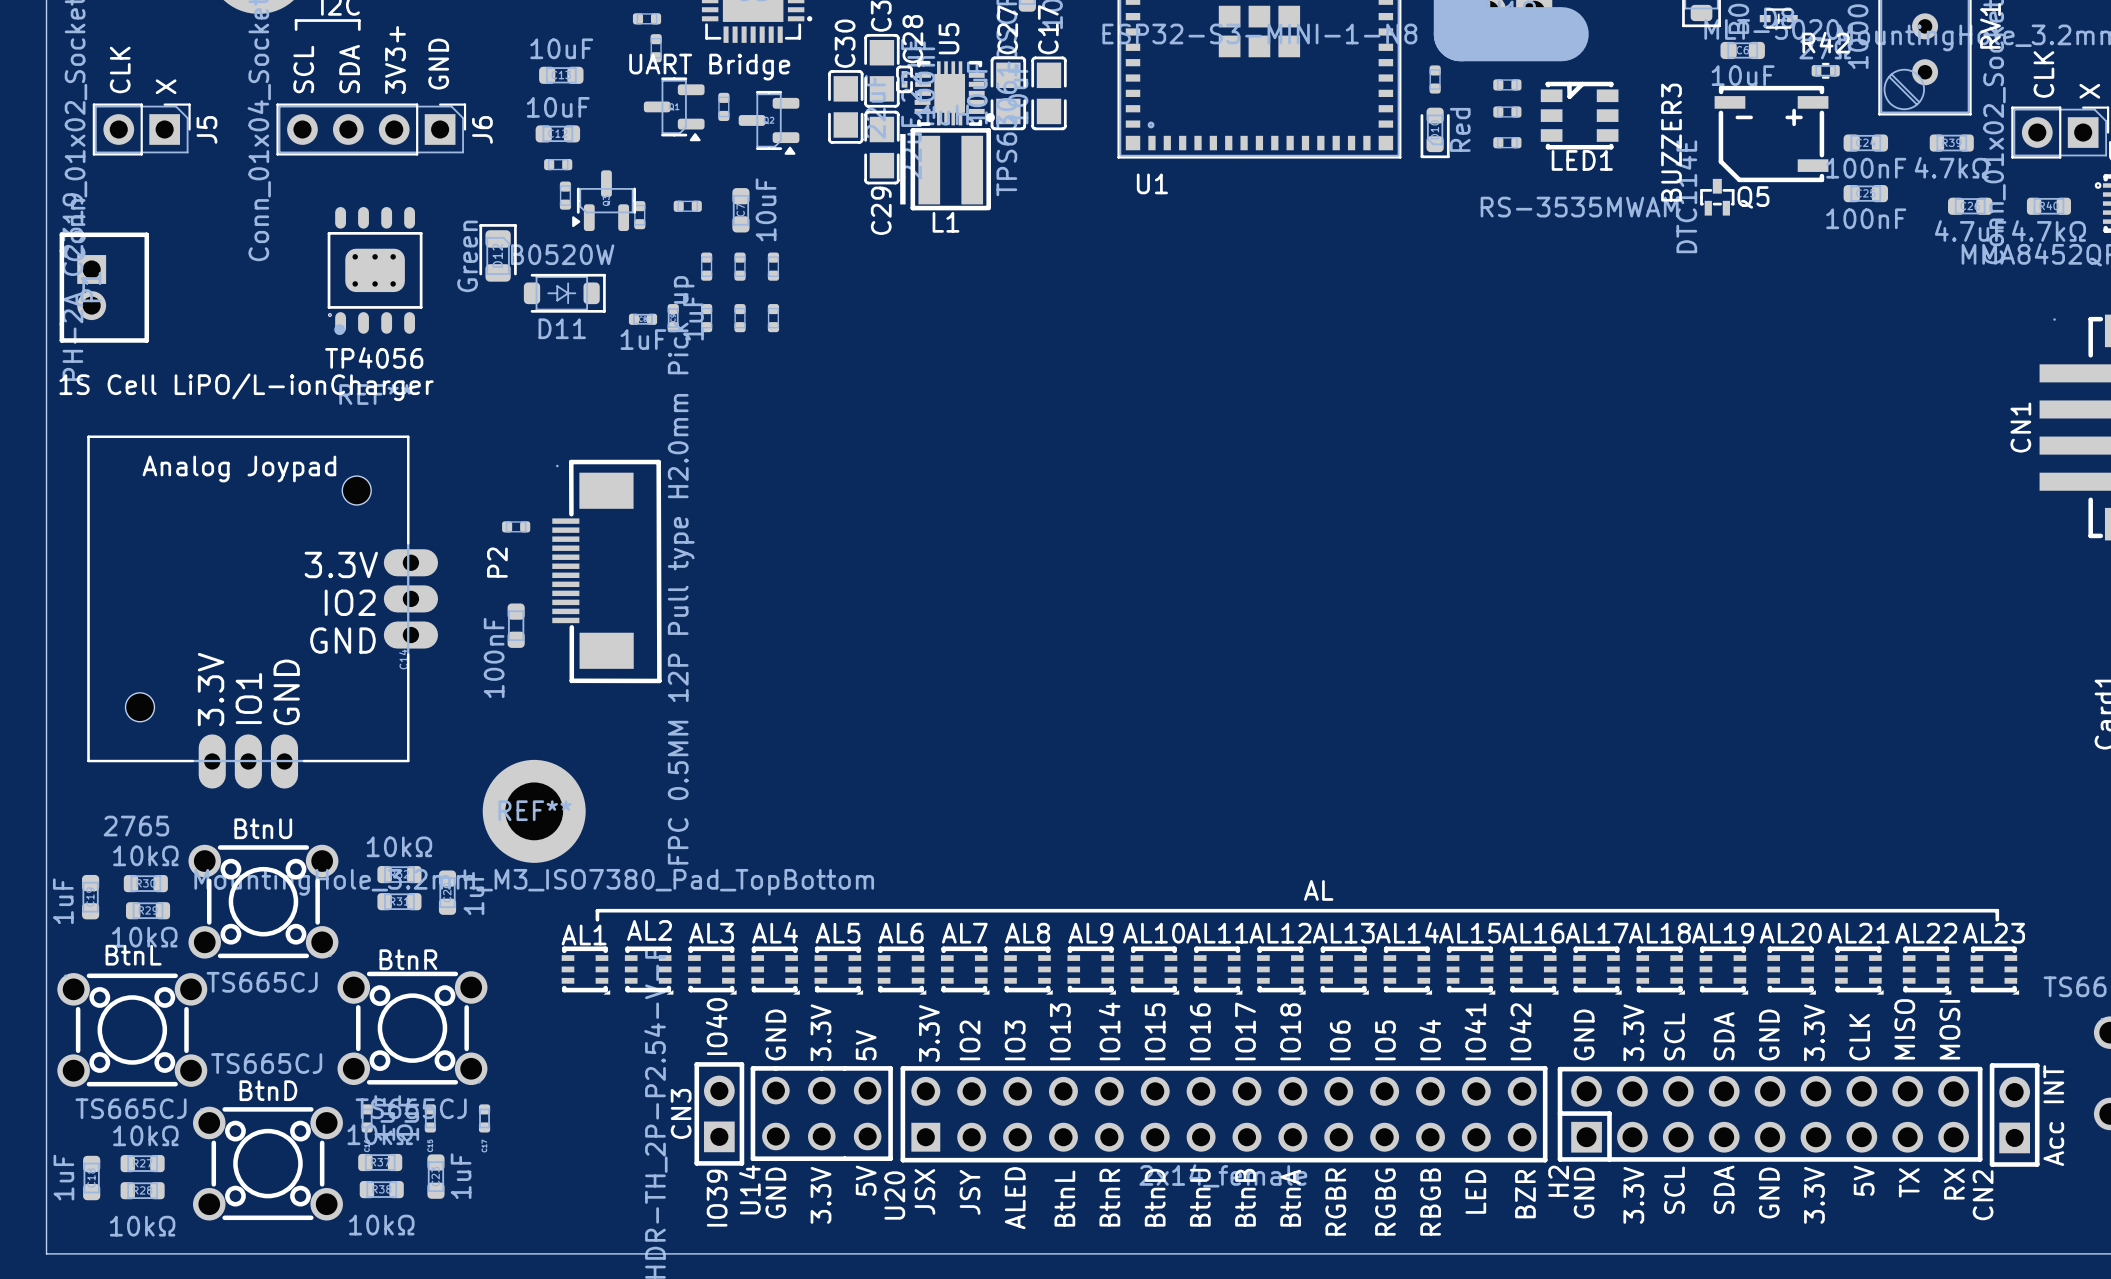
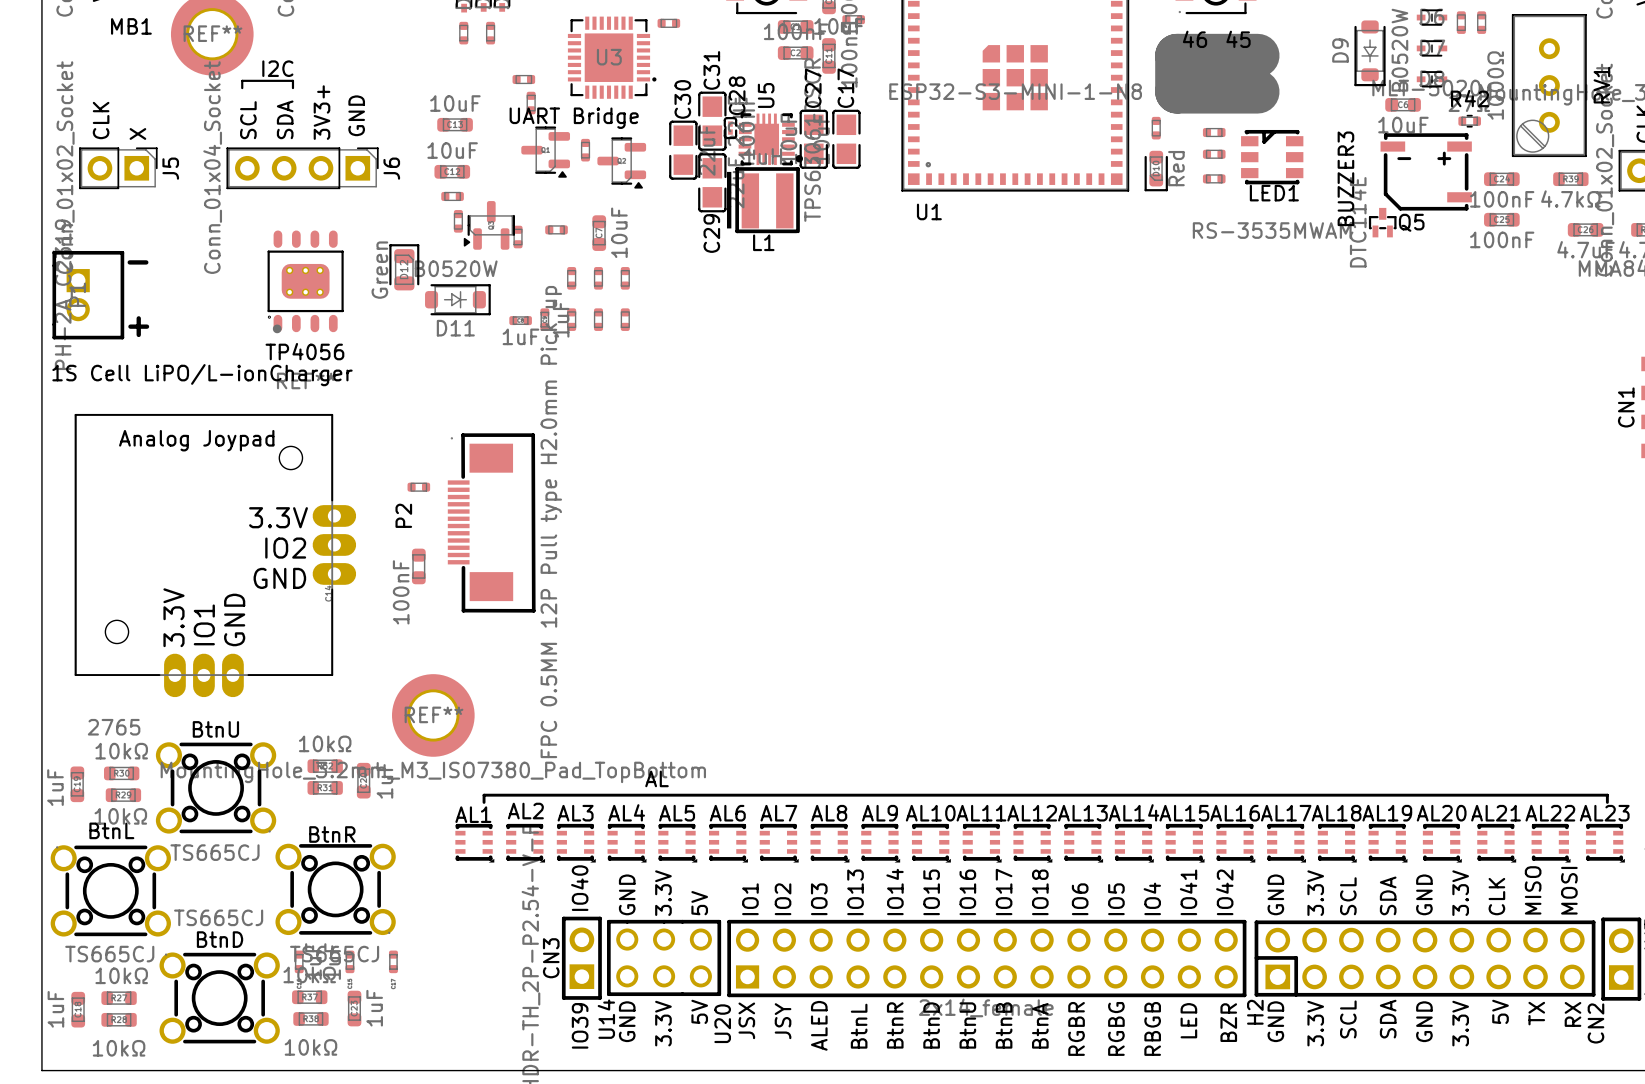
text: none -> - (138, 262)
text: none -> + (138, 326)
text: none -> AL (657, 778)
text: AL (1318, 890) -> none
text: 3.3V (929, 1033) -> IO1 (750, 899)

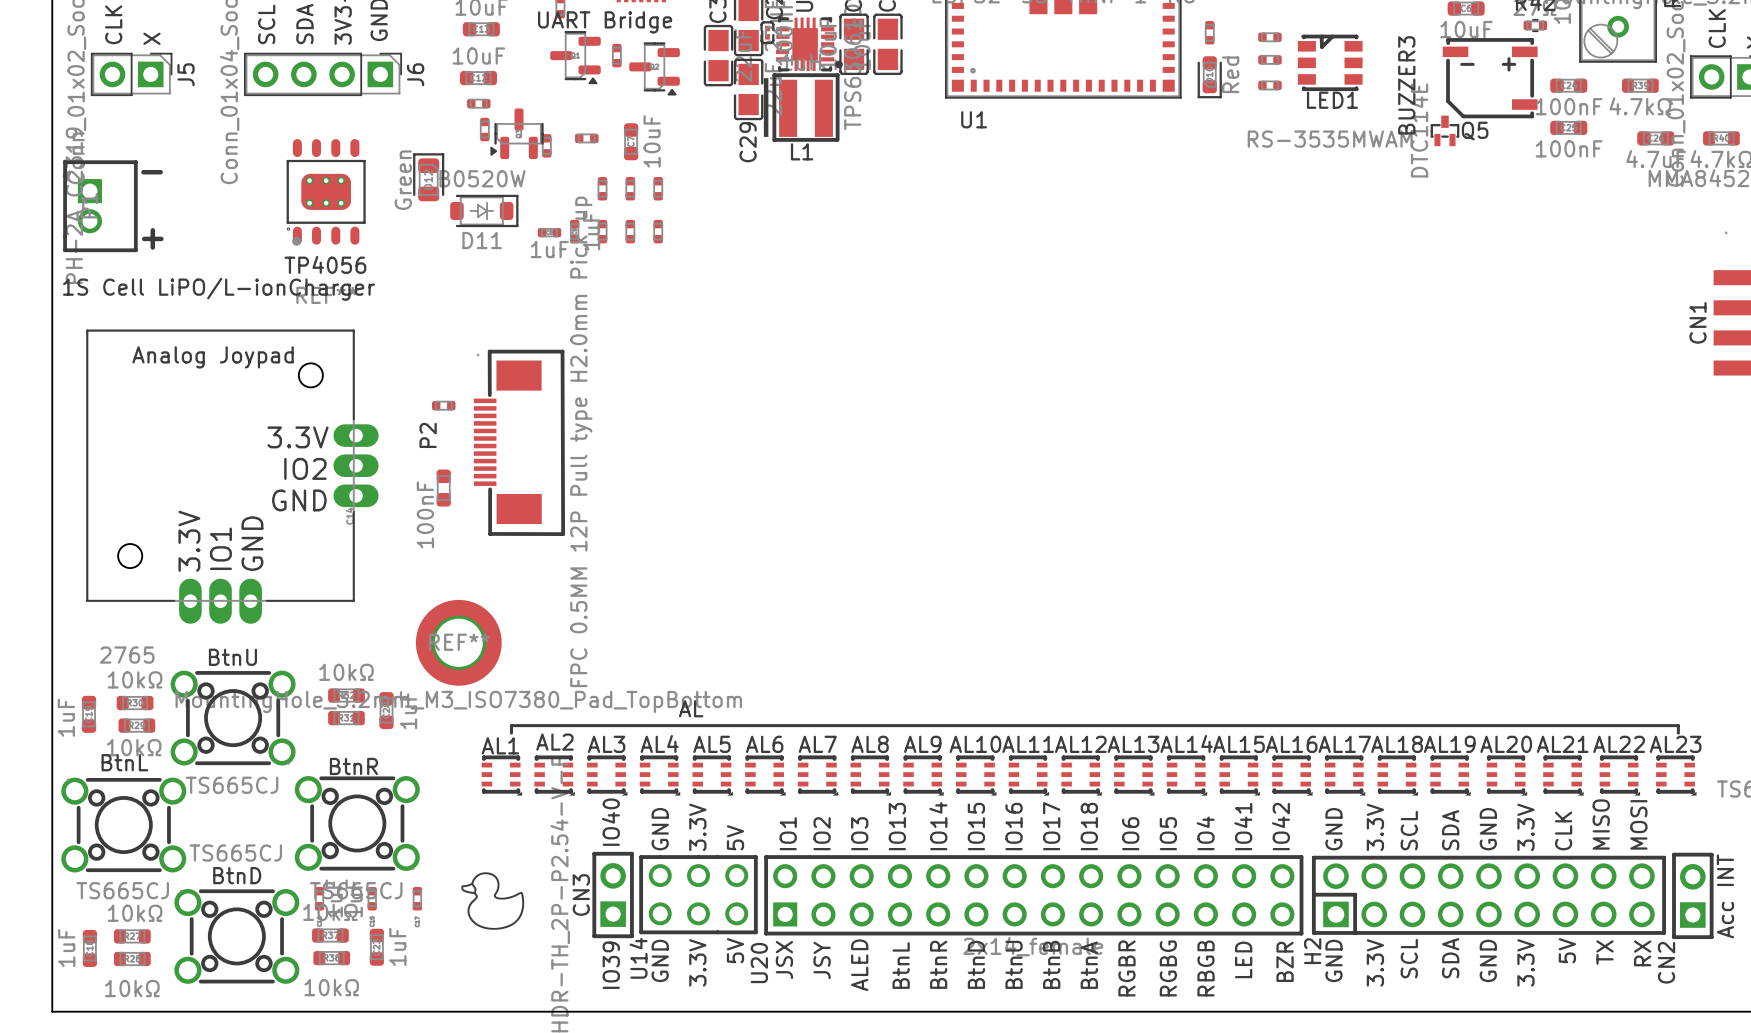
drawing: none -> [461, 872, 525, 930]

